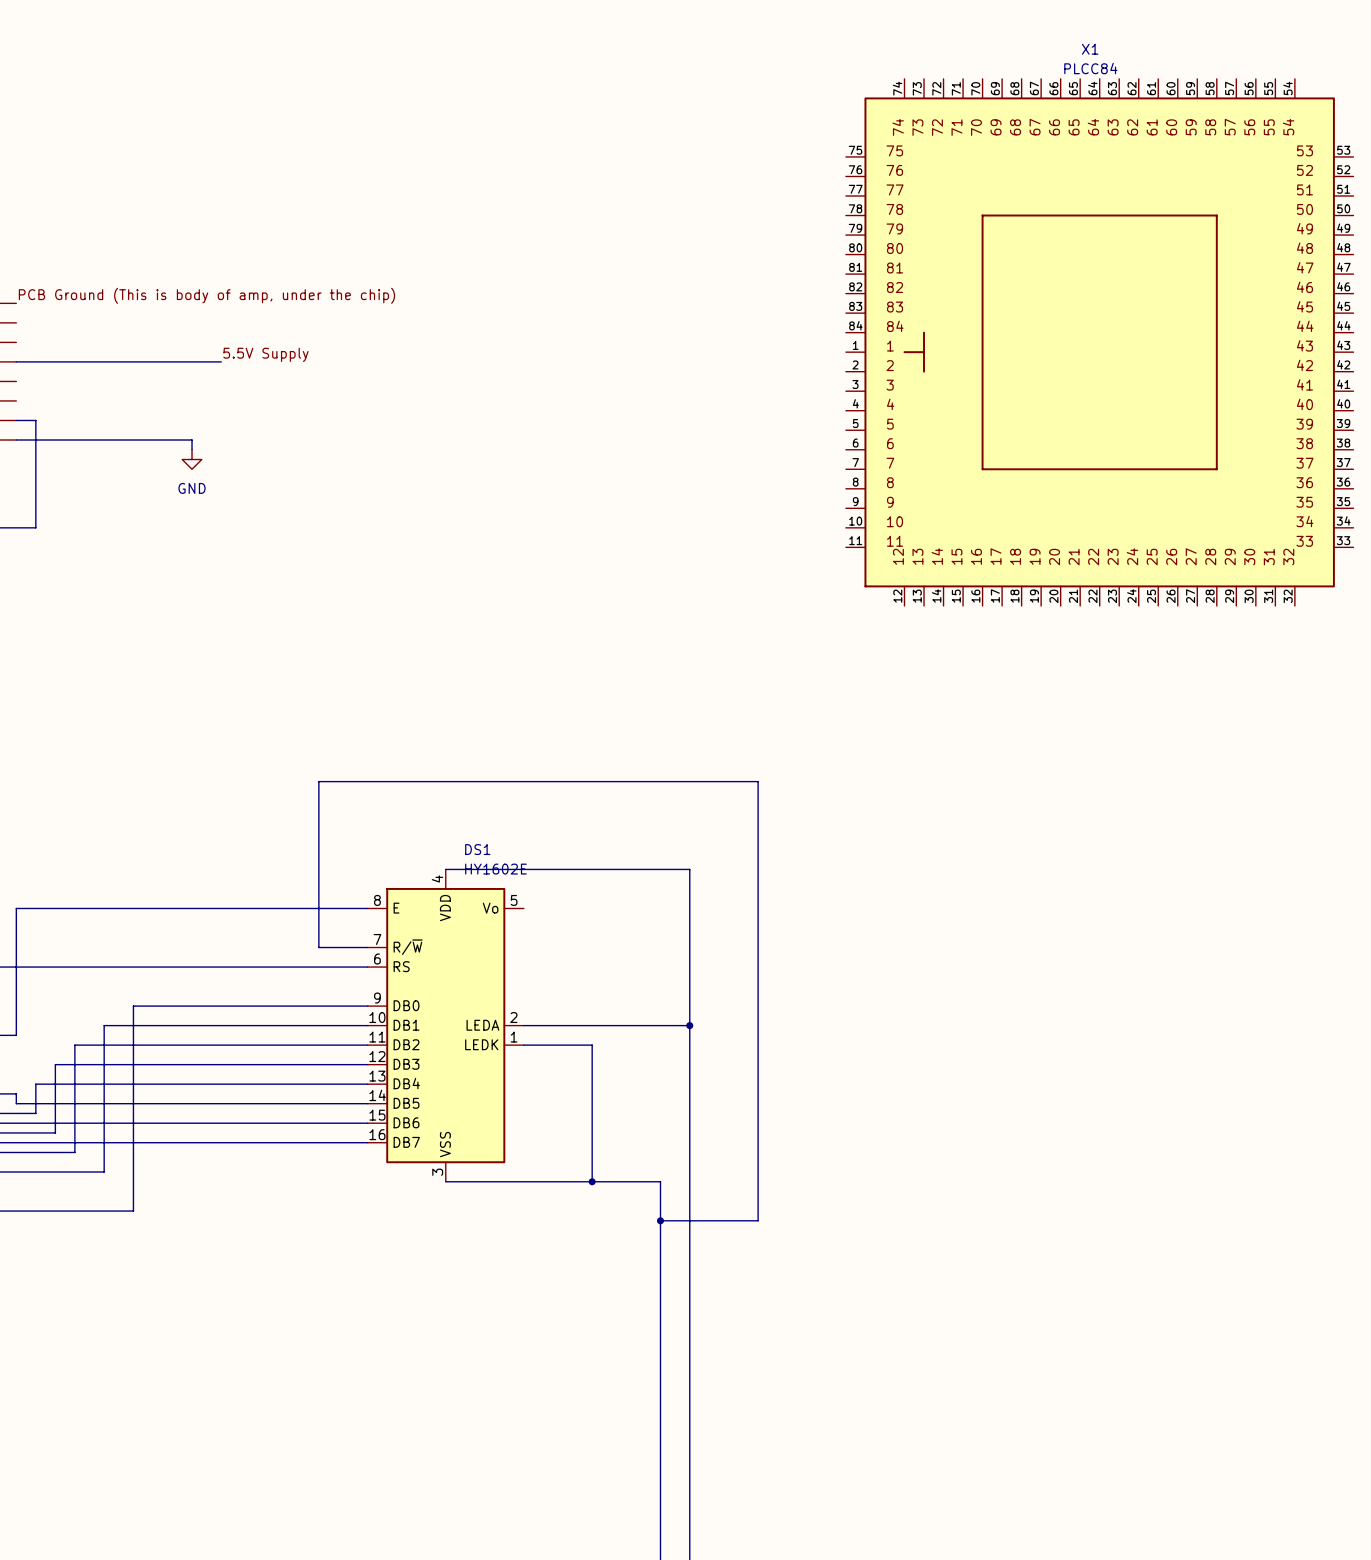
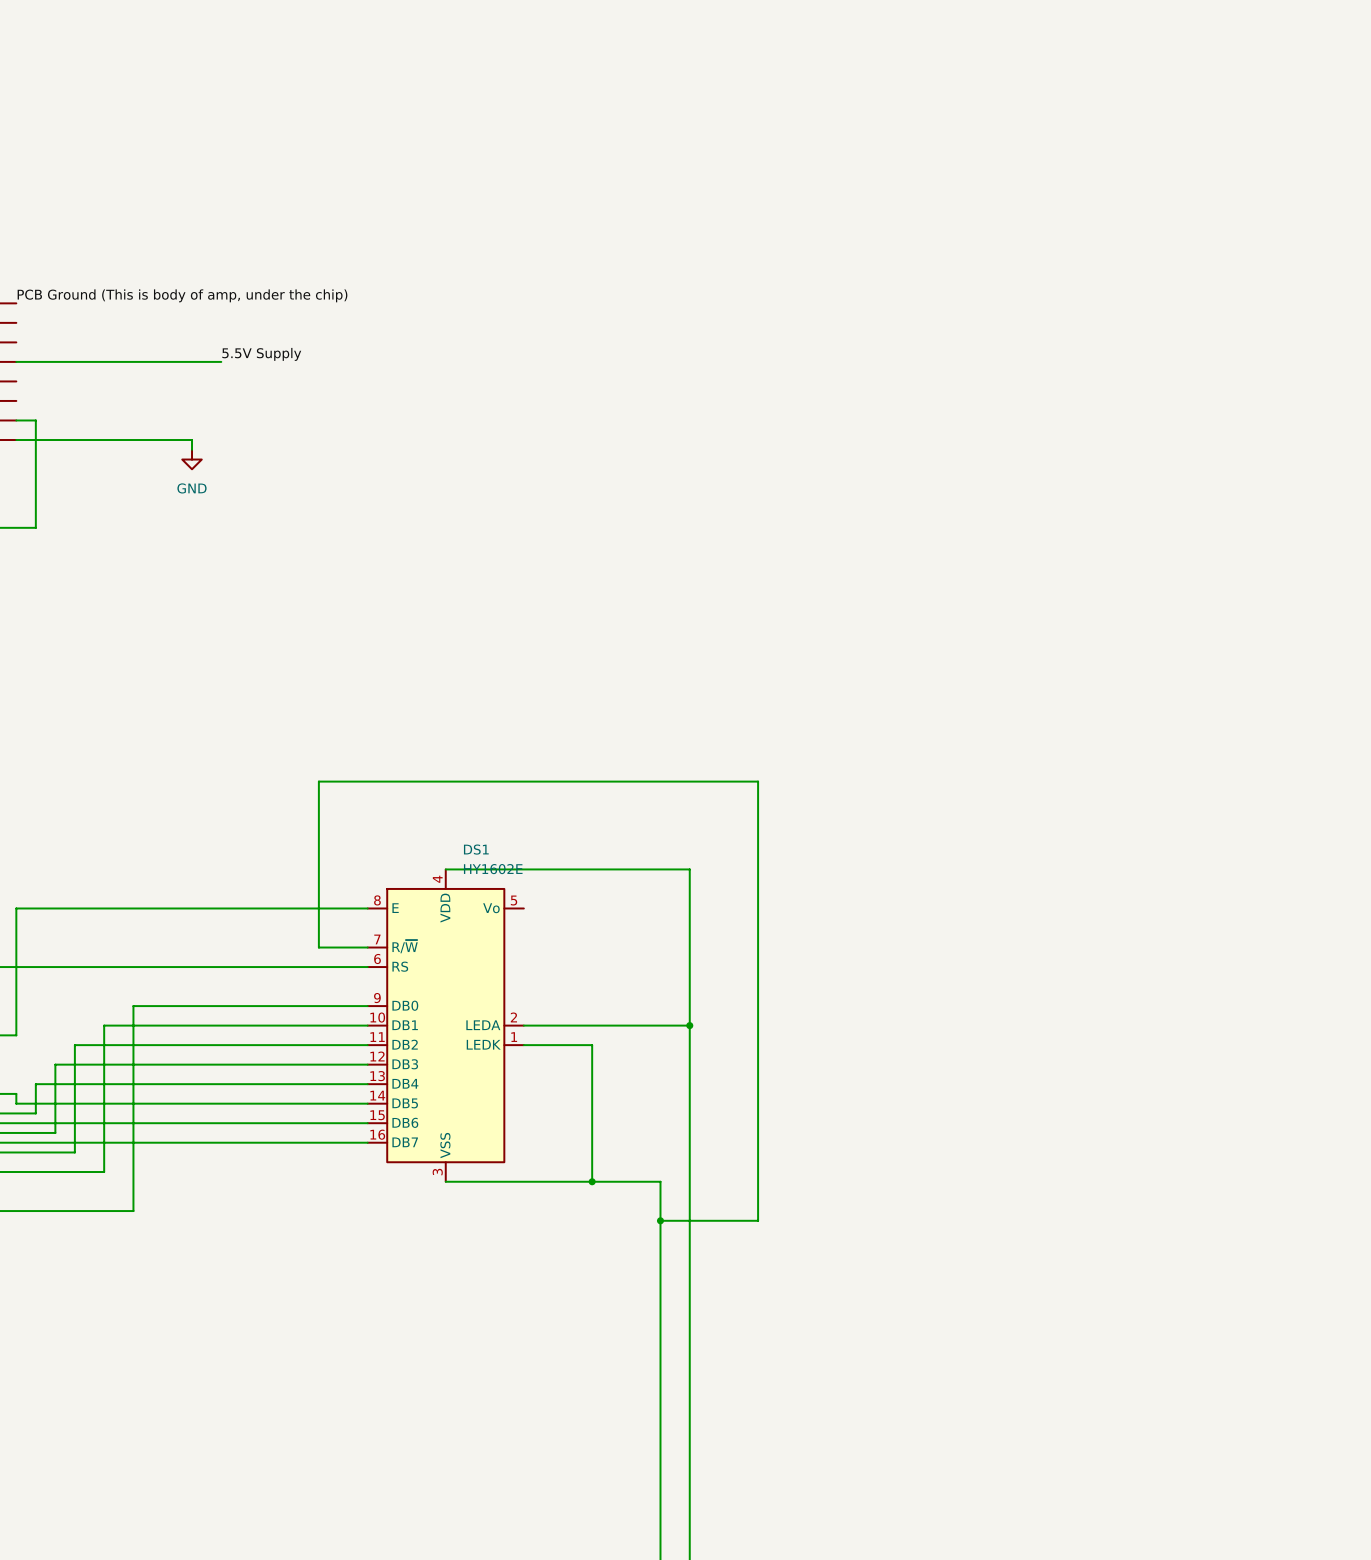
X1: PLCC84 (1099, 342) -> none

